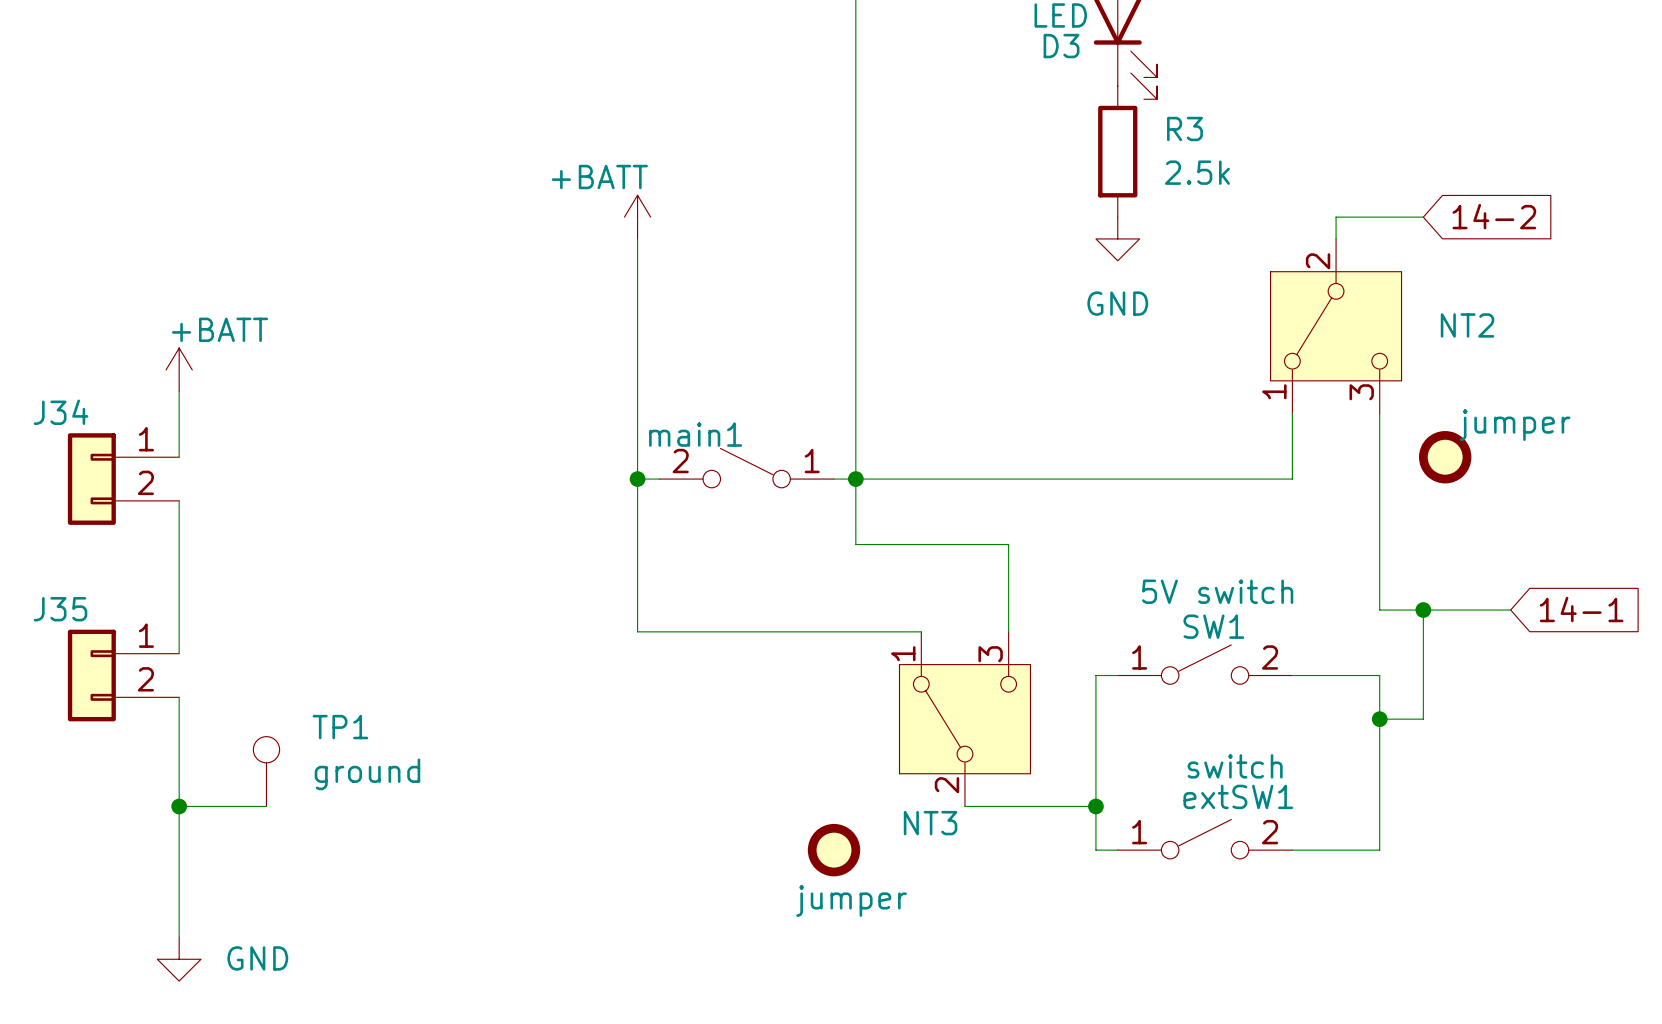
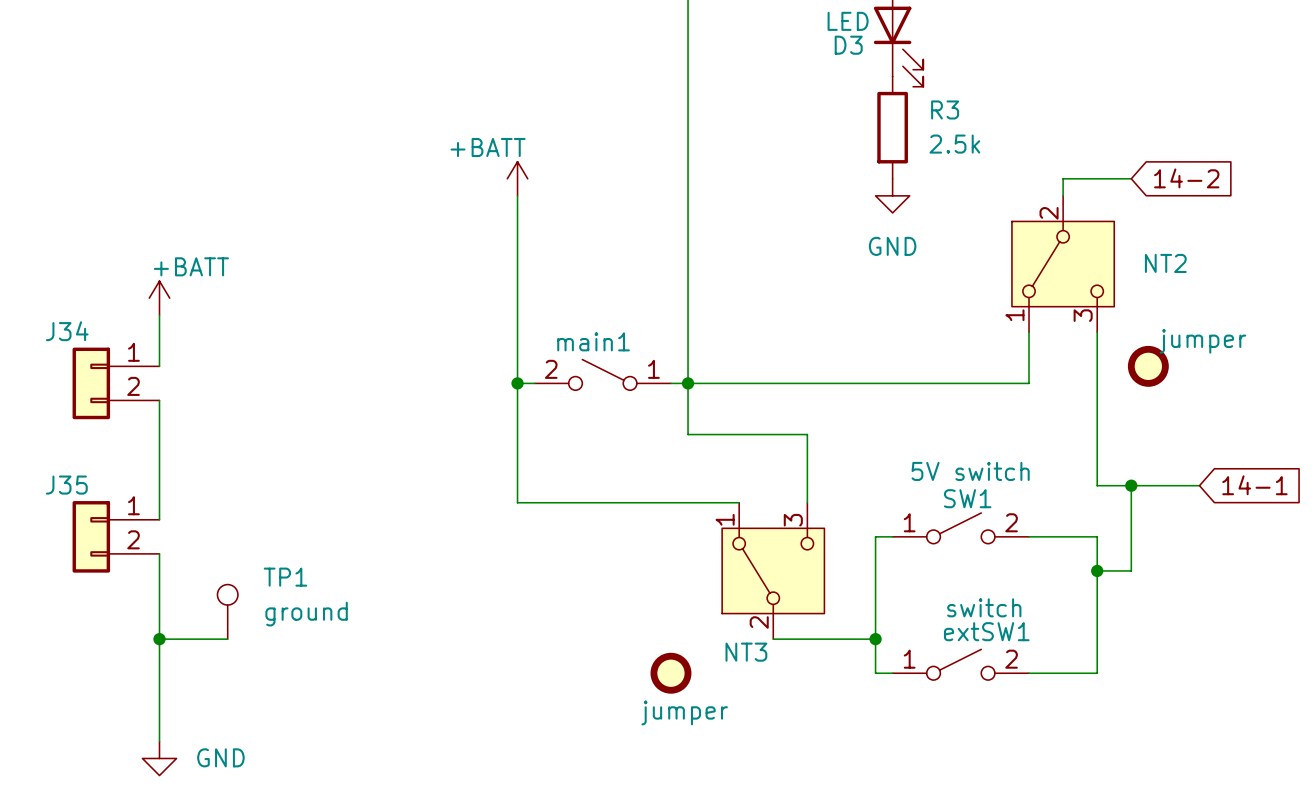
main1 name position: main1 (695, 434) -> main1 (593, 341)

